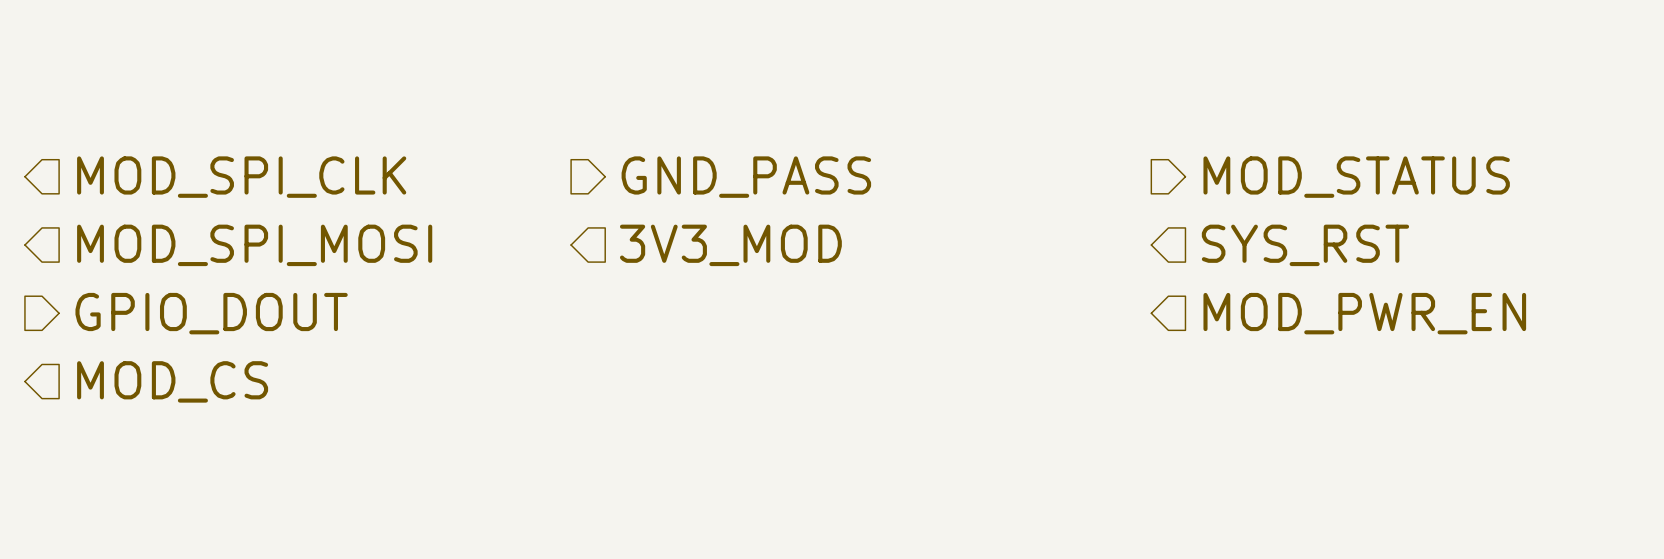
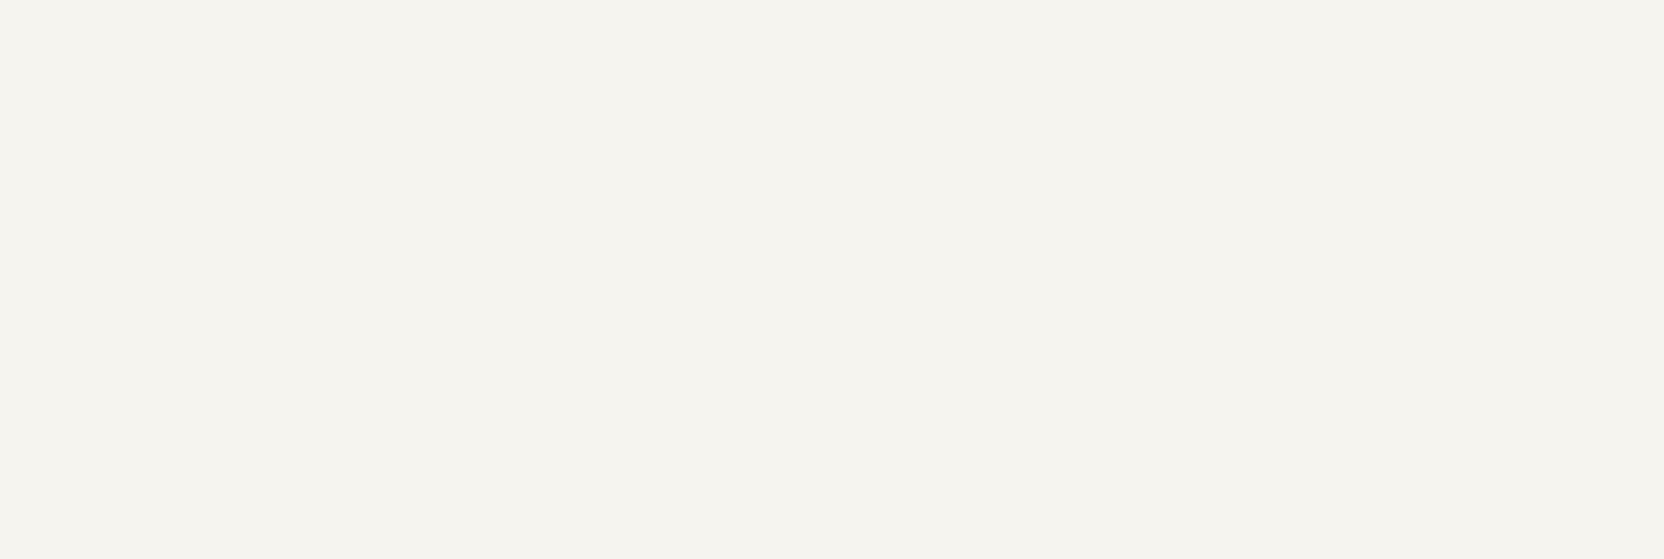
hierarchical label: MOD_SPI_CLK (241, 177) -> none
hierarchical label: GND_PASS (746, 177) -> none
hierarchical label: MOD_STATUS (1356, 177) -> none
hierarchical label: MOD_SPI_MOSI (254, 245) -> none
hierarchical label: 3V3_MOD (730, 245) -> none
hierarchical label: SYS_RST (1305, 245) -> none
hierarchical label: GPIO_DOUT (211, 313) -> none
hierarchical label: MOD_PWR_EN (1364, 313) -> none
hierarchical label: MOD_CS (172, 381) -> none

